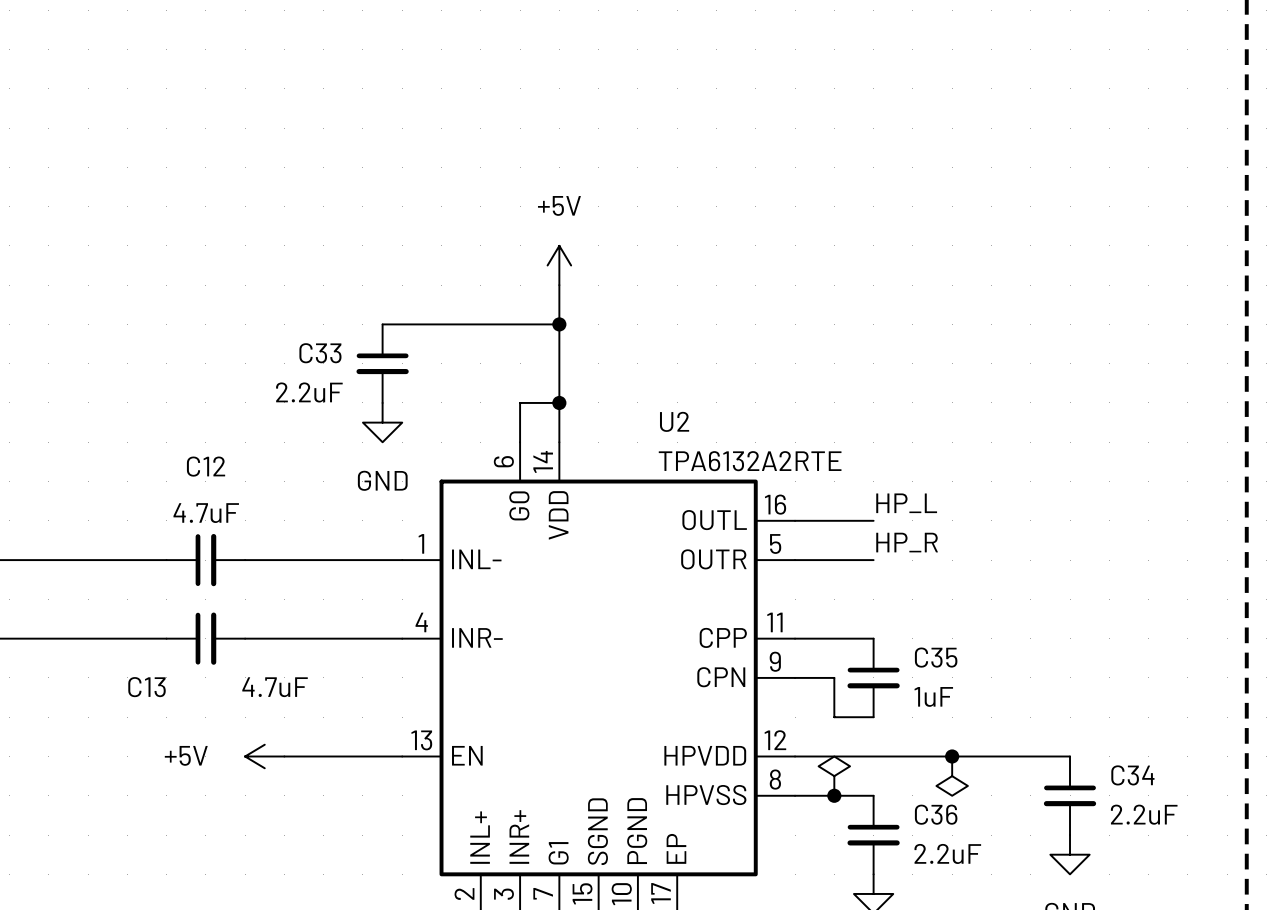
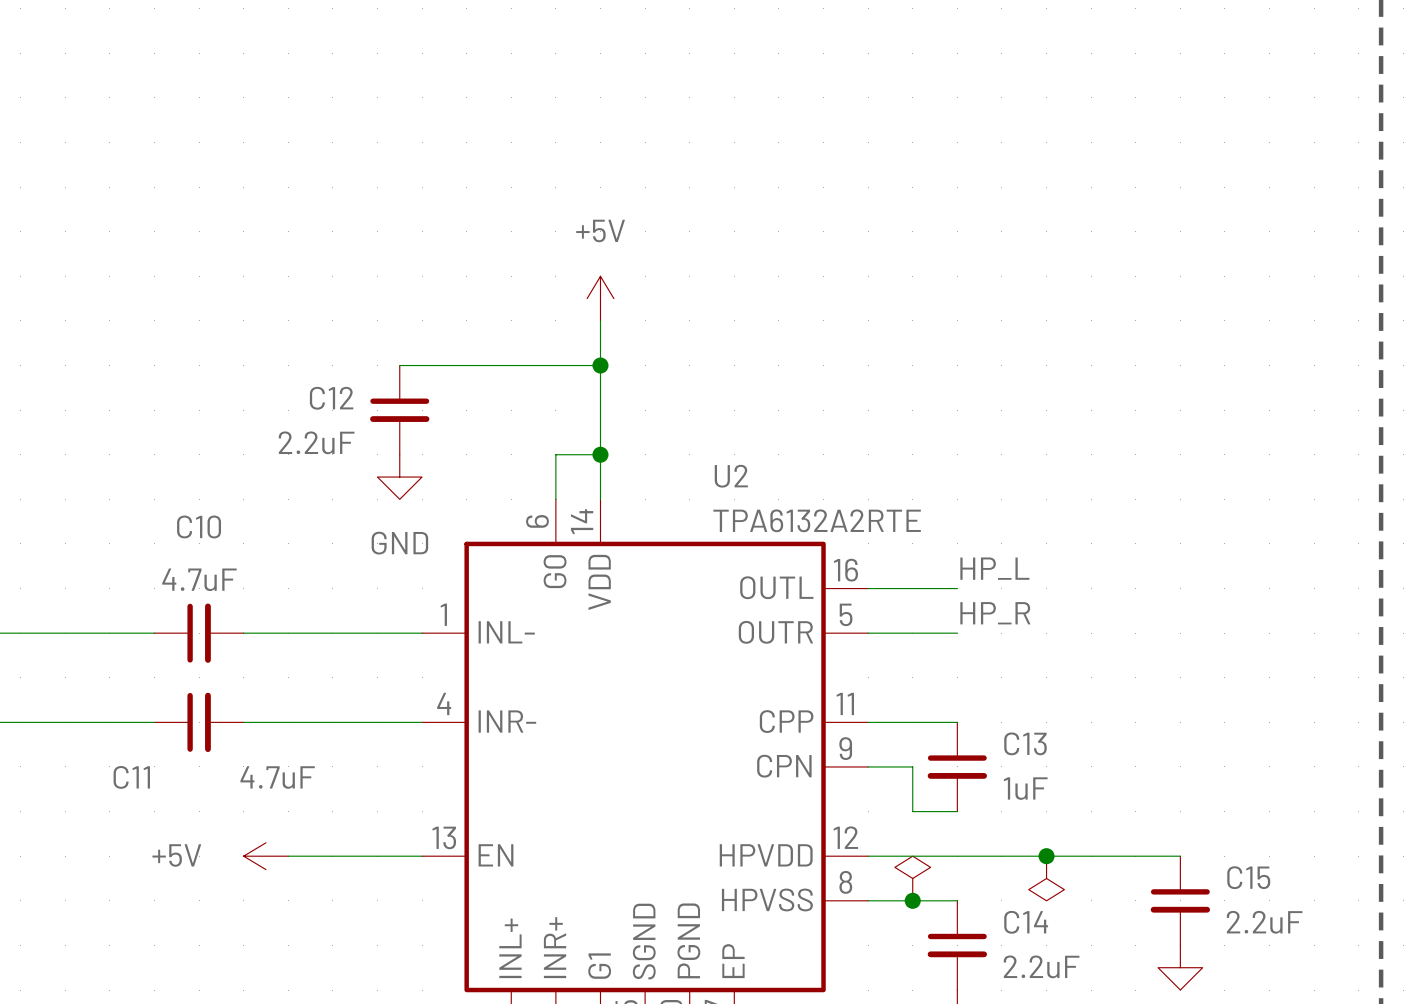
C33 name: C33 (320, 353) -> C12 (331, 398)
C12 name: C12 (206, 466) -> C10 (199, 526)
C35 name: C35 (936, 657) -> C13 (1025, 743)
C13 name: C13 (147, 687) -> C11 (131, 777)
C34 name: C34 (1132, 775) -> C15 (1248, 877)
C36 name: C36 (936, 814) -> C14 (1026, 922)

